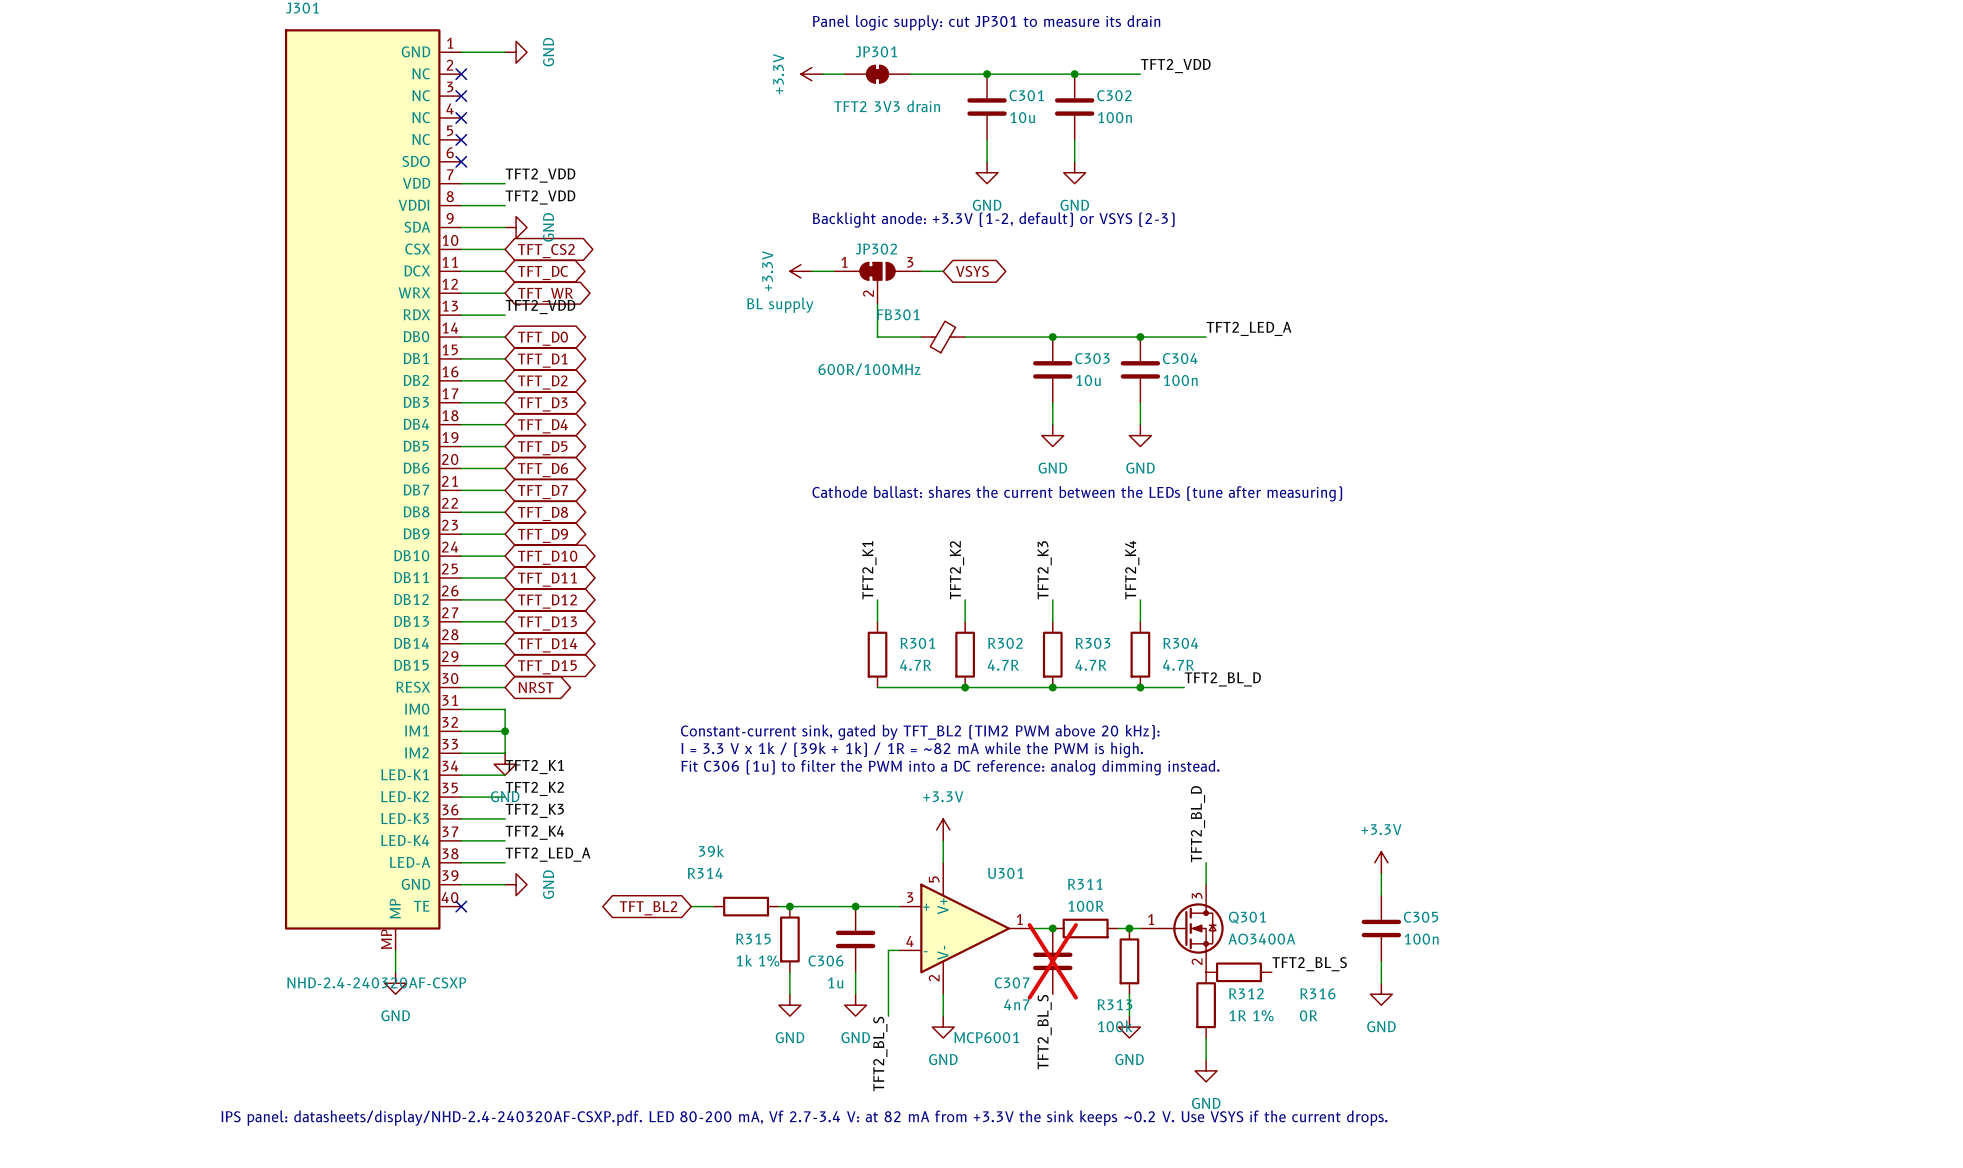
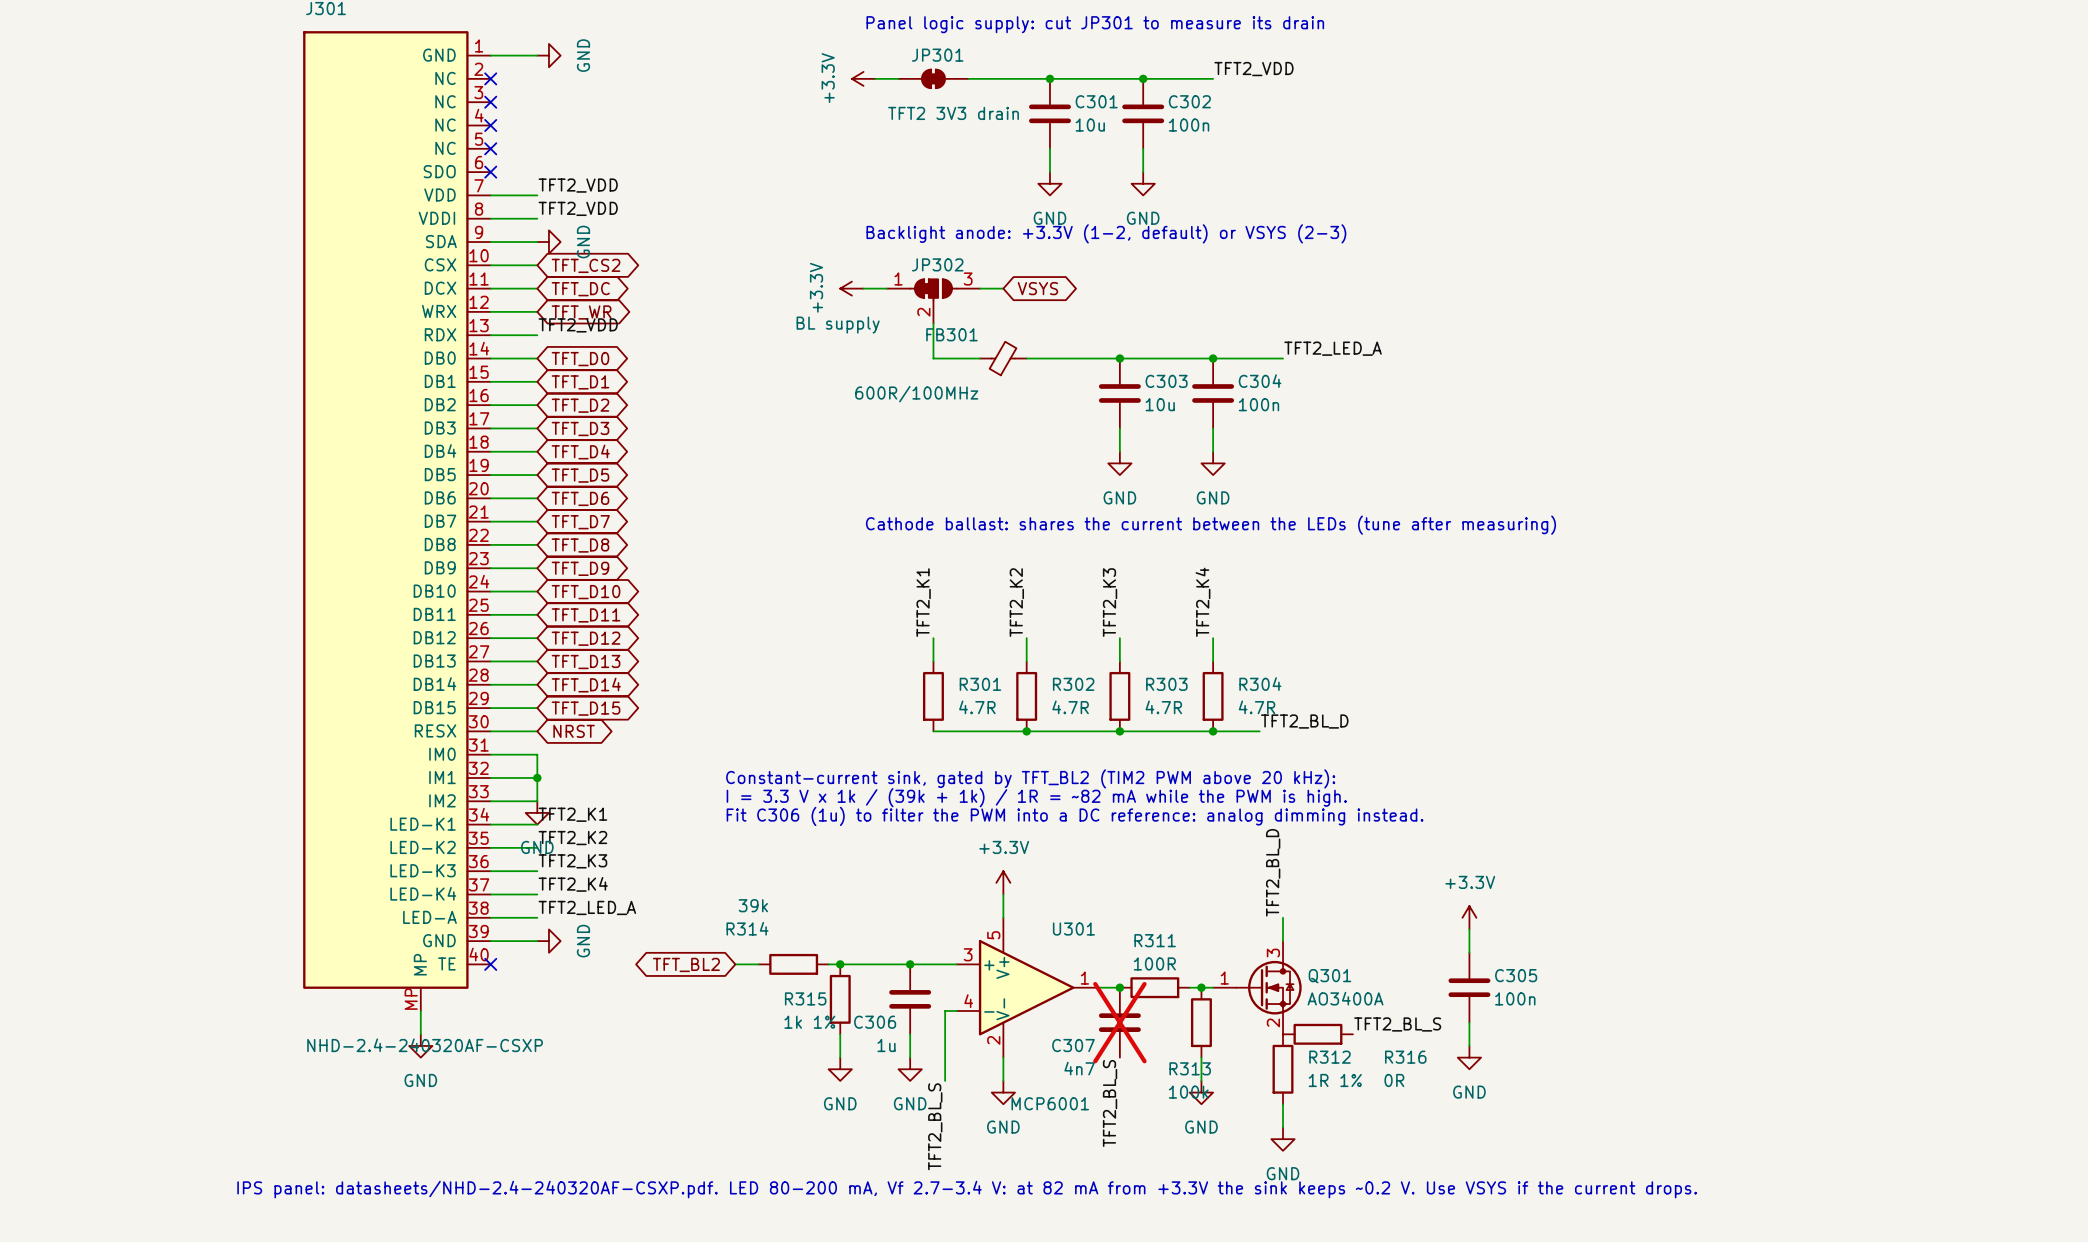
text: IPS panel: datasheets/display/NHD-2.4-240320AF-CSXP.pdf. LED 80-200 mA, Vf 2.7-3.4 V: at 82 mA from +3.3V the sink keeps ~0.2 V. Use VSYS if the current drops. (804, 1118) -> IPS panel: datasheets/NHD-2.4-240320AF-CSXP.pdf. LED 80-200 mA, Vf 2.7-3.4 V: at 82 mA from +3.3V the sink keeps ~0.2 V. Use VSYS if the current drops. (967, 1189)

